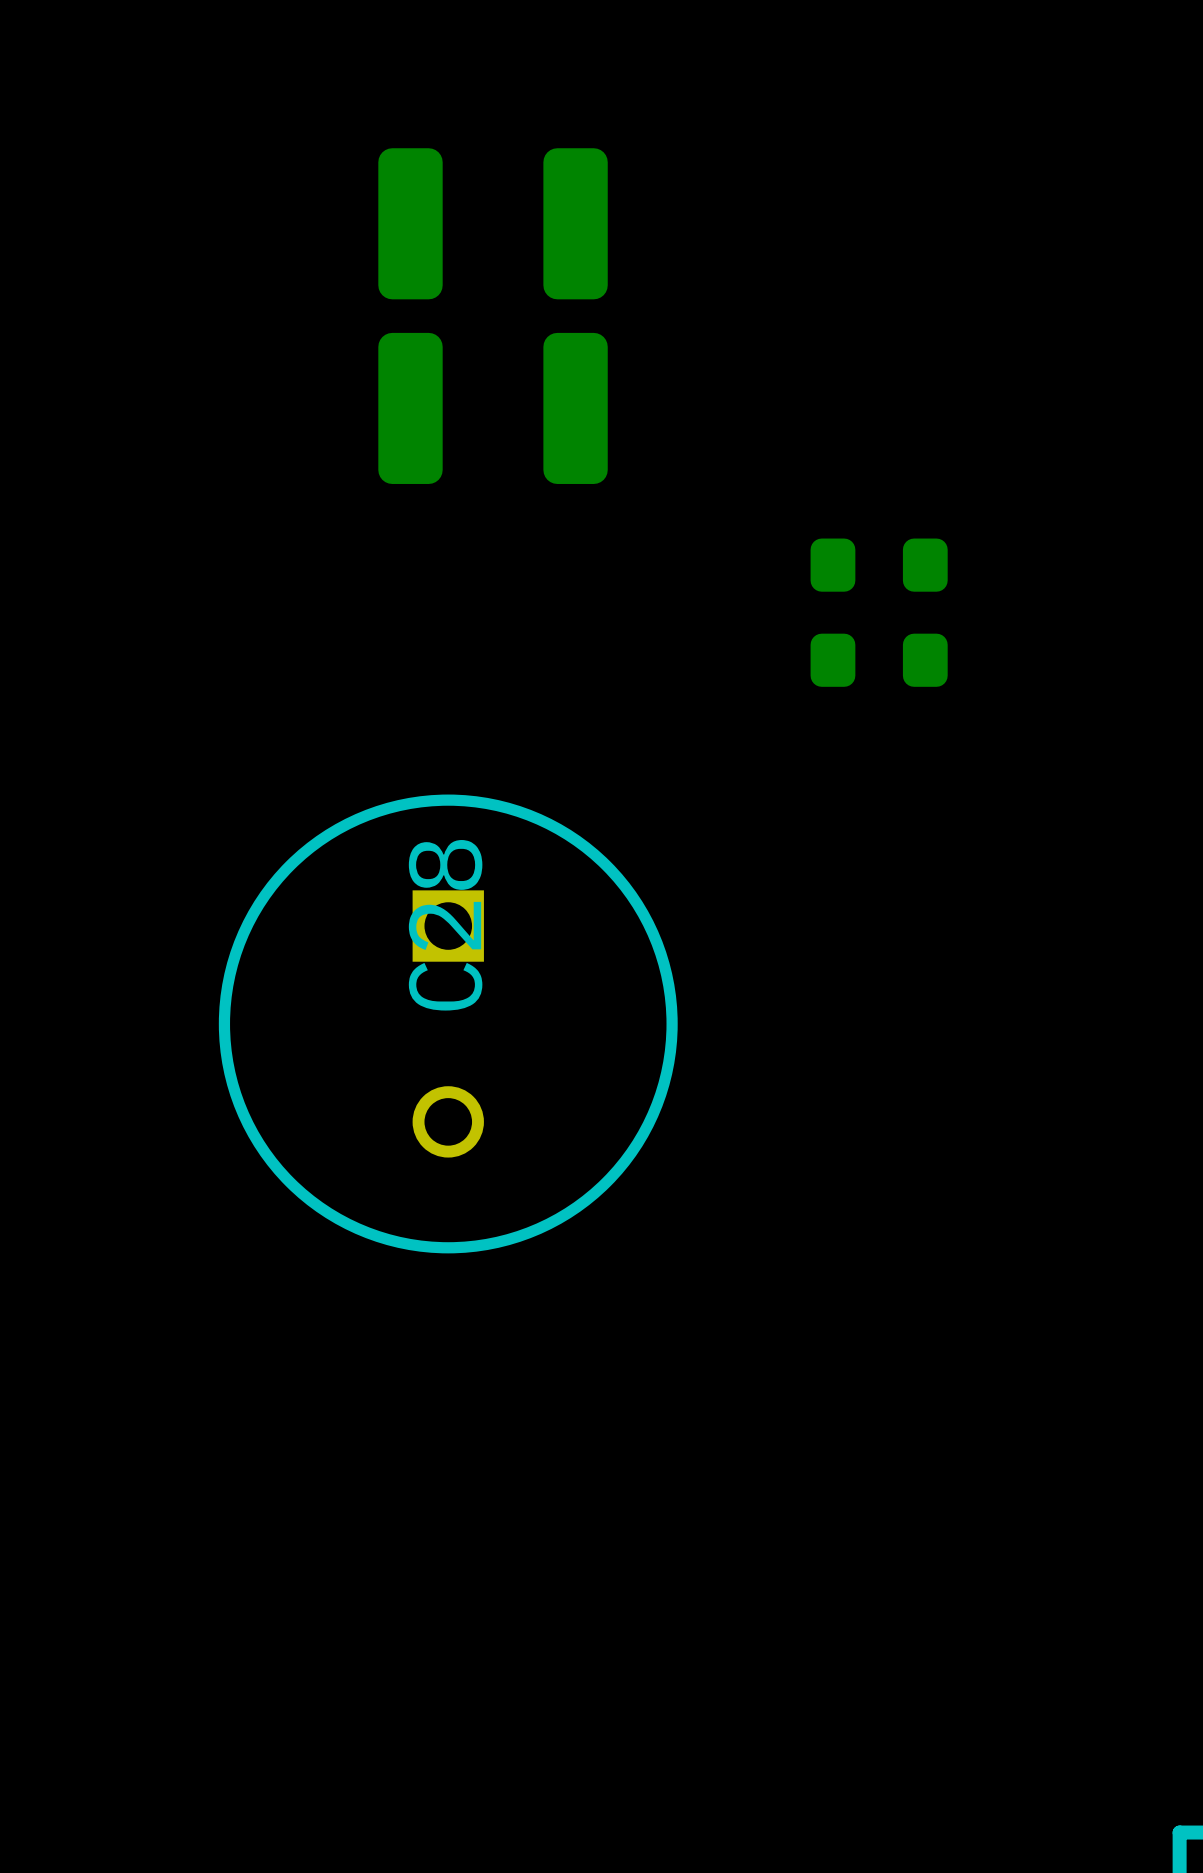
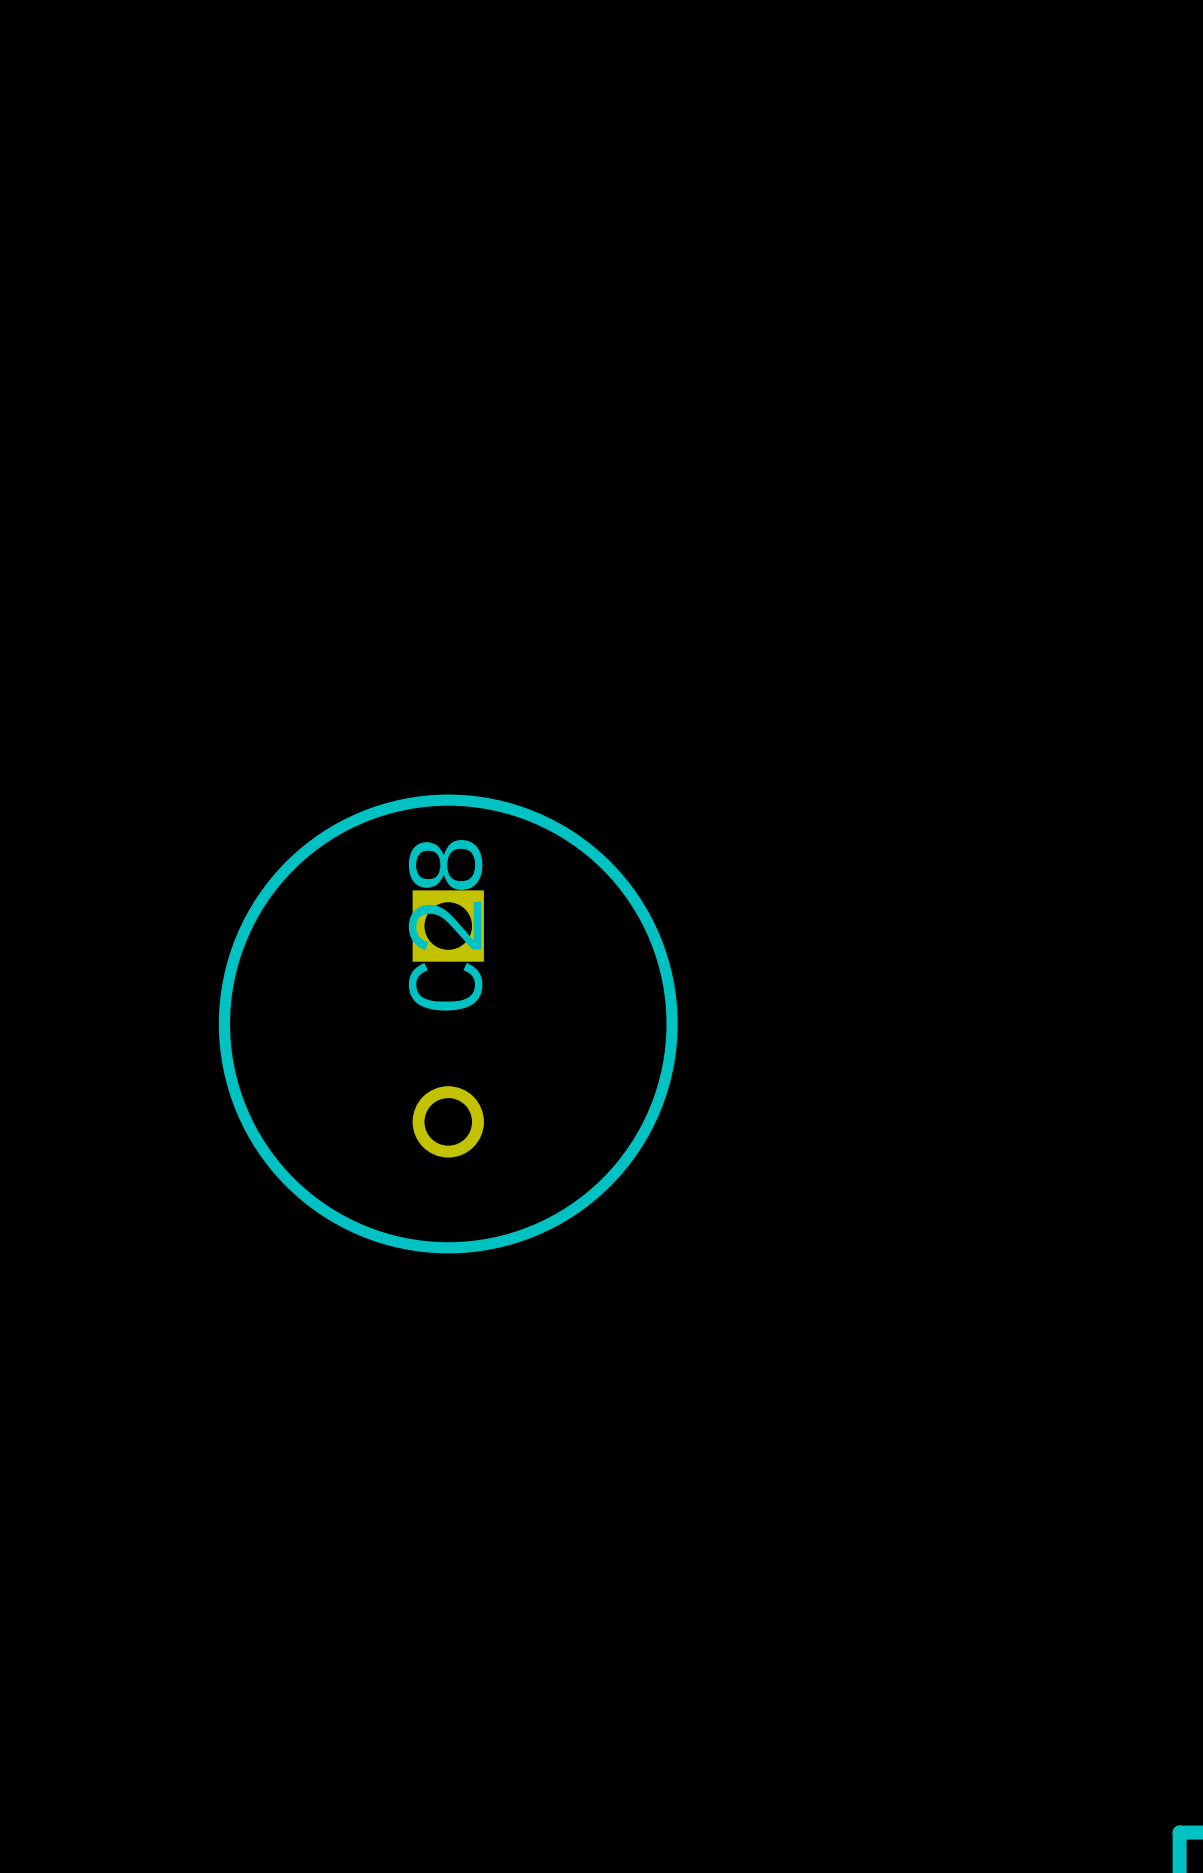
part: (493, 223) -> none
part: (493, 408) -> none
part: (879, 565) -> none
part: (879, 660) -> none

